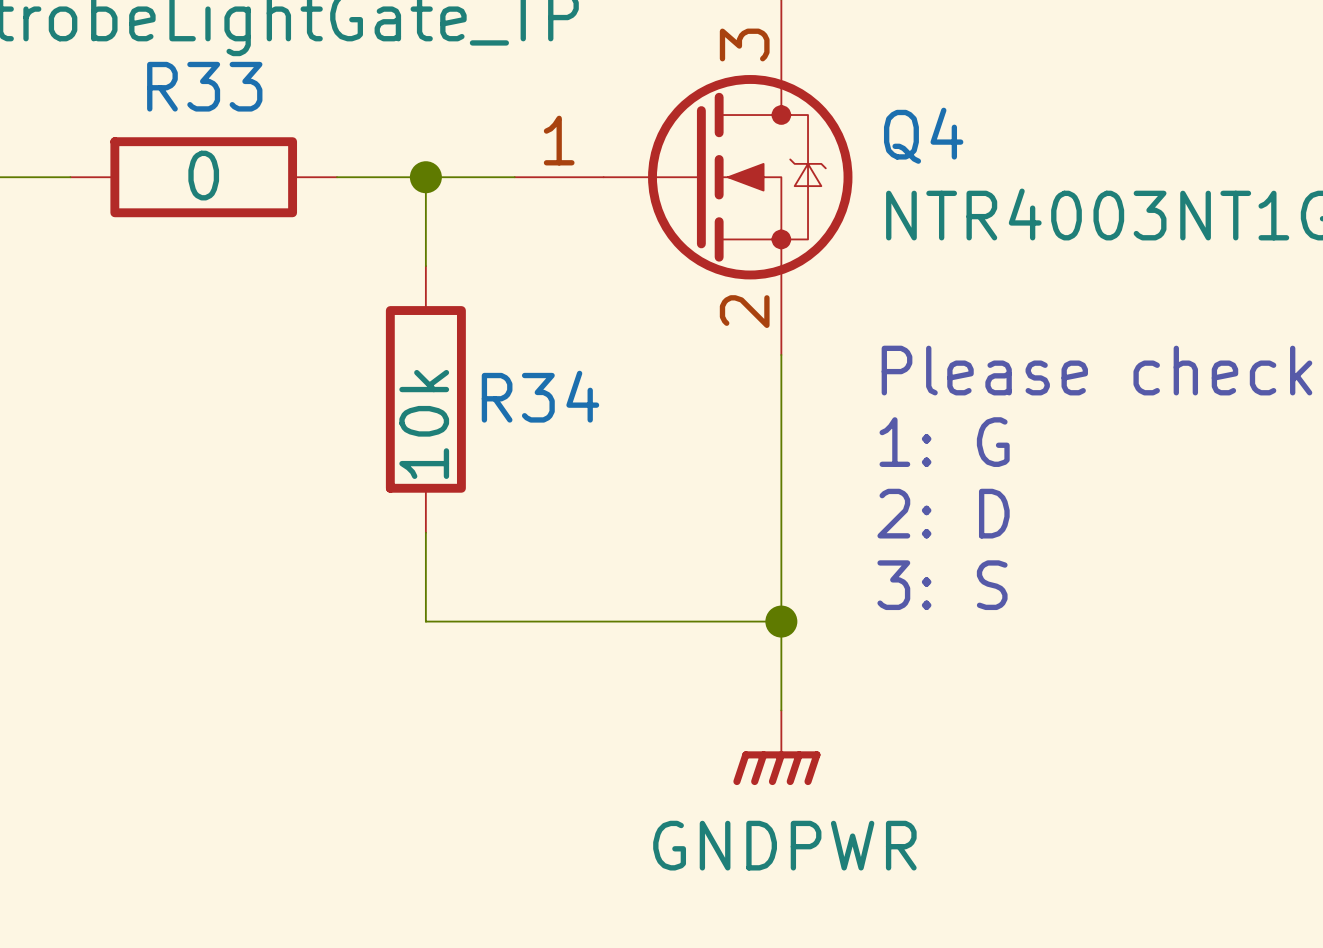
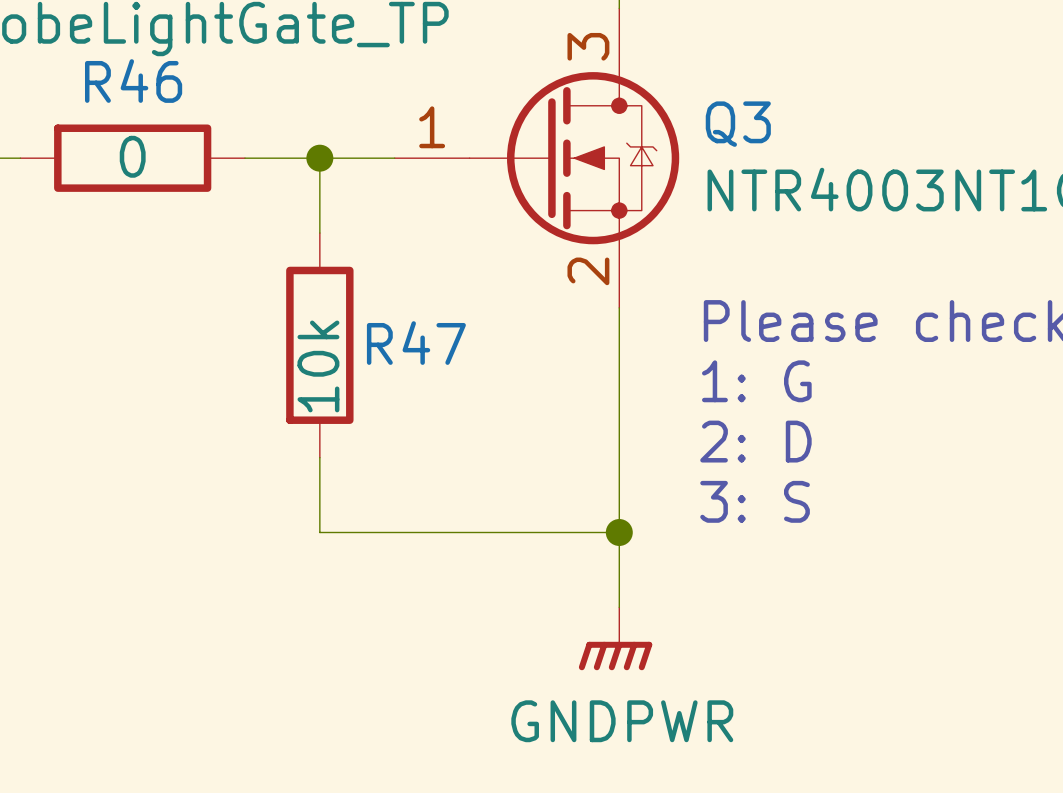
R33 name: R33 (204, 86) -> R46 (133, 81)
Q4 name: Q4 (923, 135) -> Q3 (738, 124)
R34 name: R34 (540, 396) -> R47 (416, 343)

